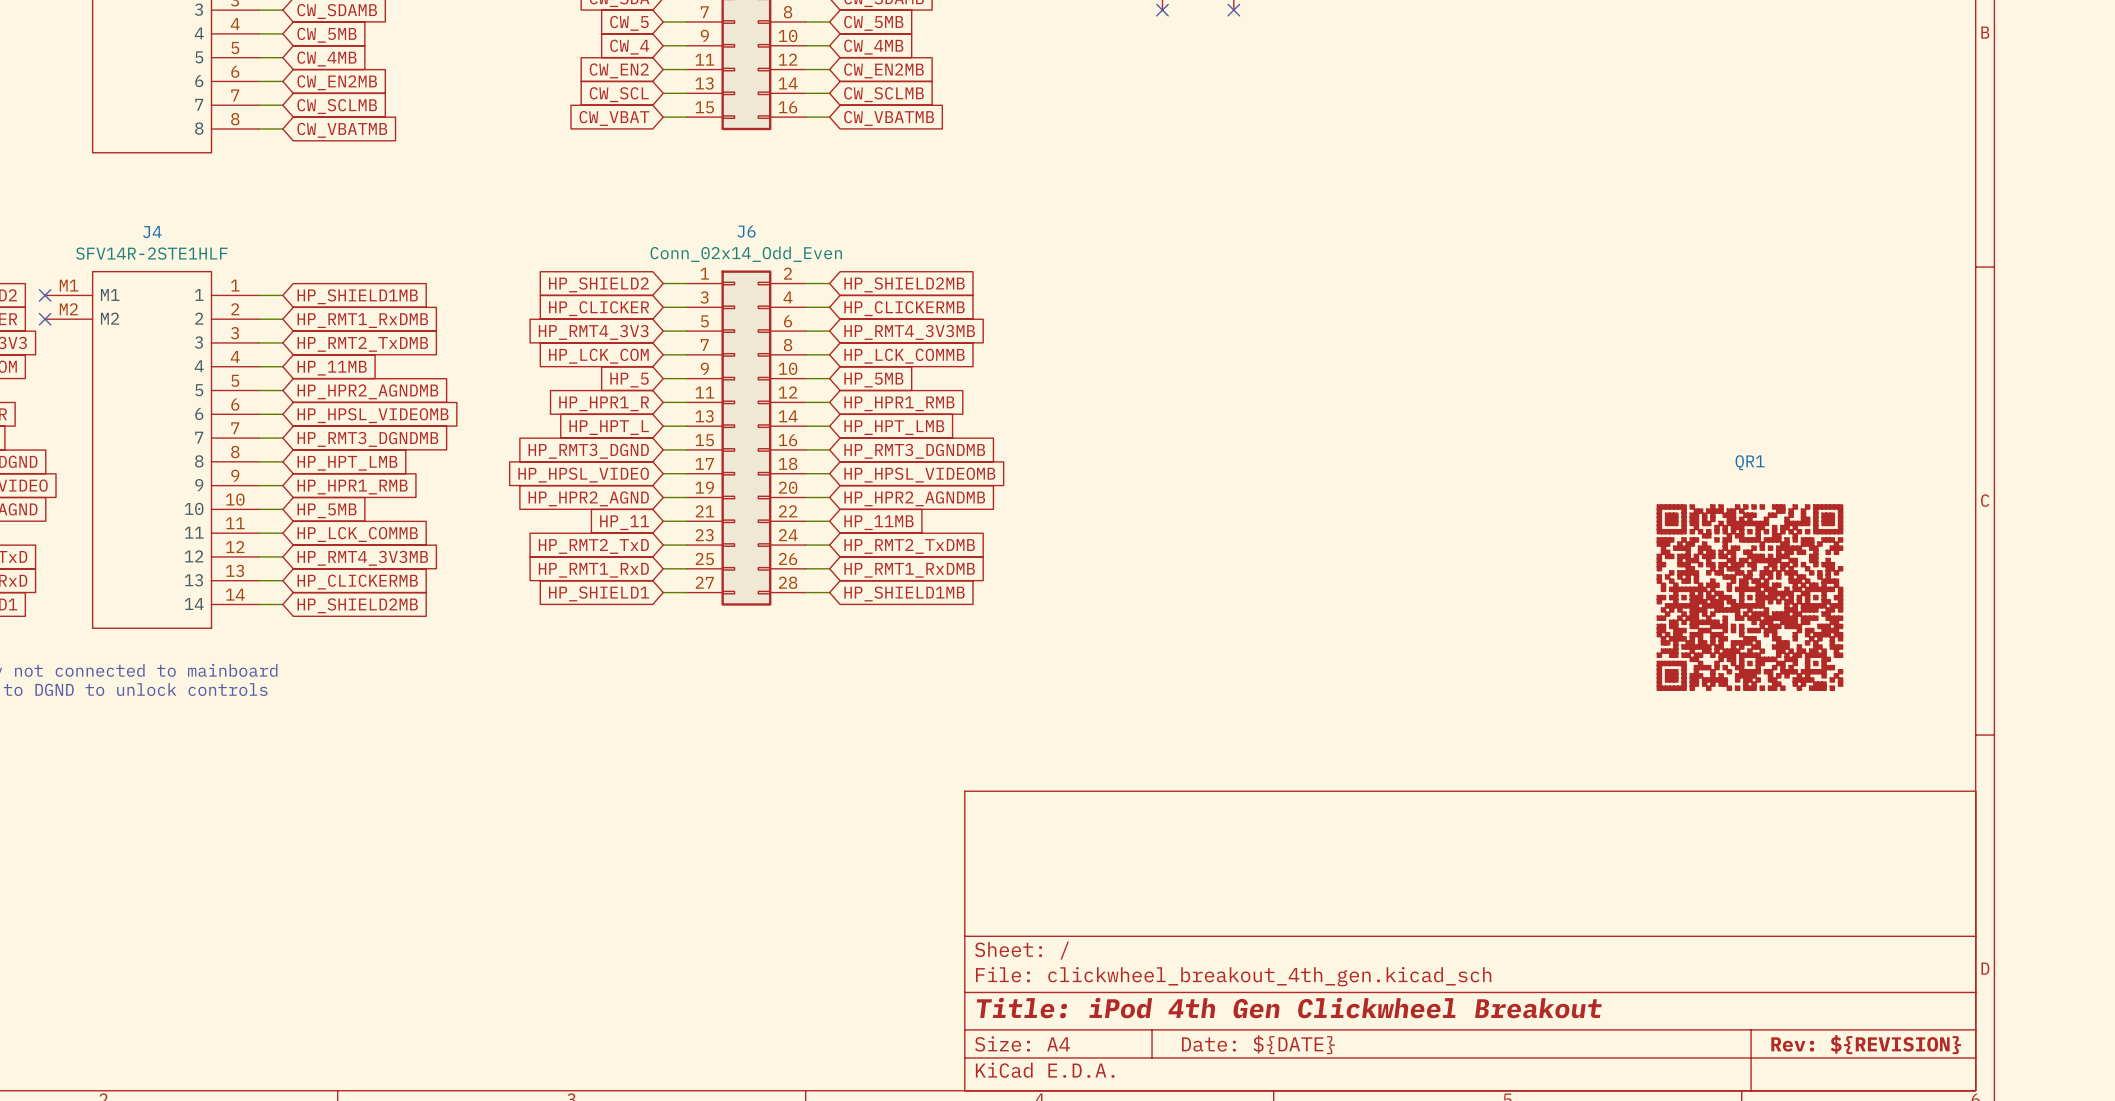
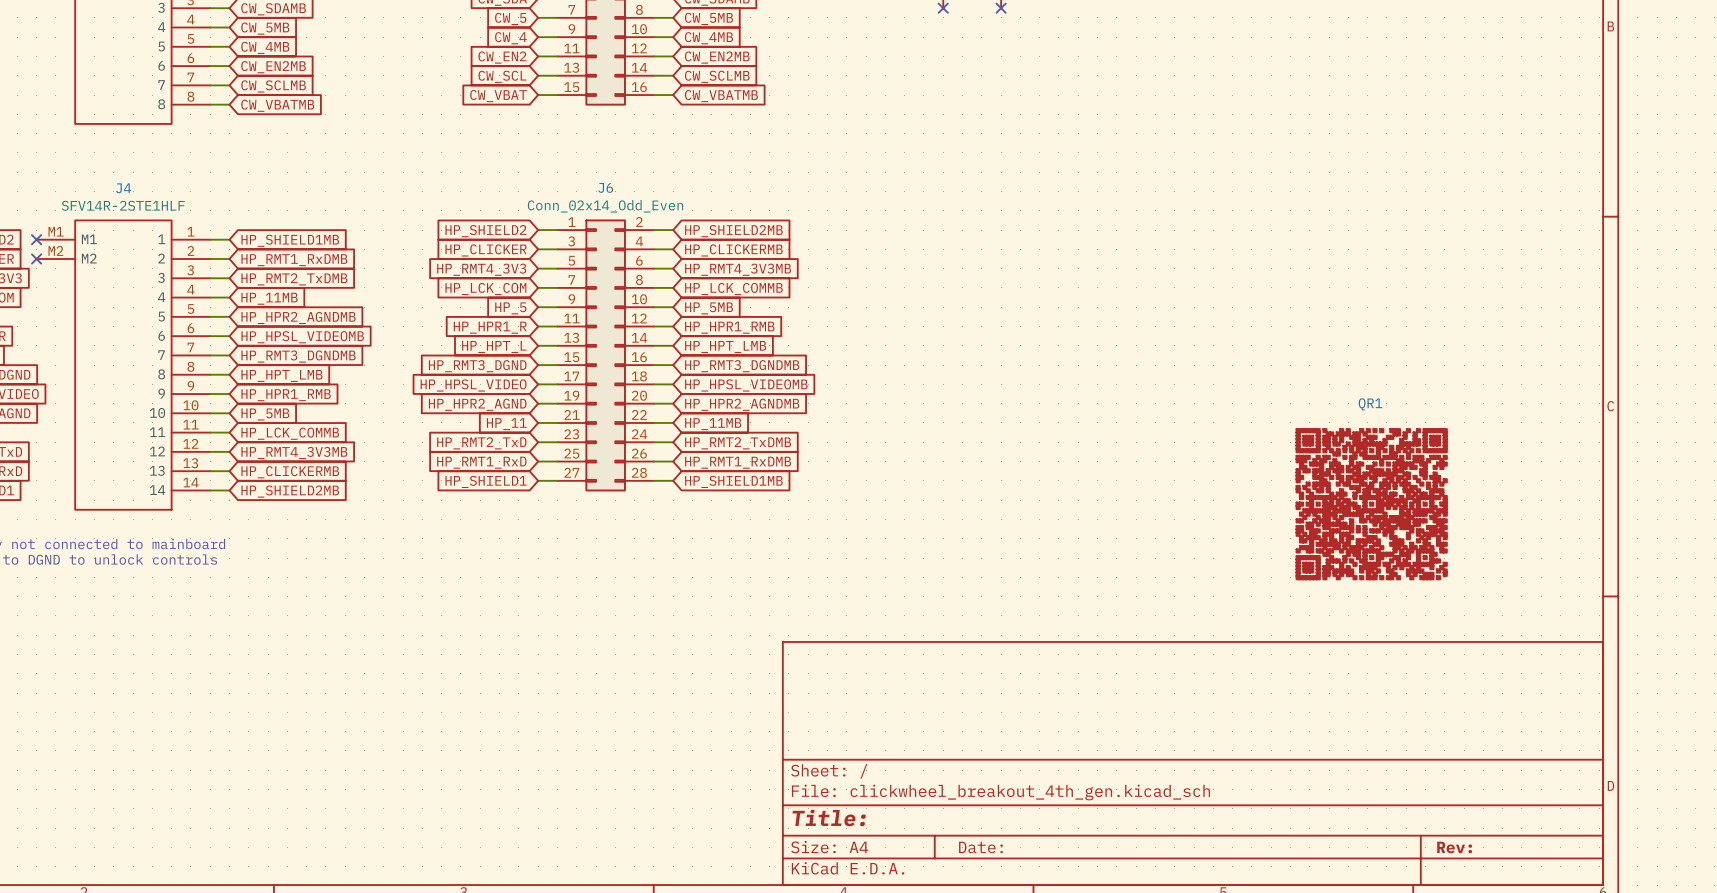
QR1 name position: QR1 (1750, 462) -> QR1 (1370, 404)
QR1 position: (1749, 597) -> (1371, 504)
title block: Title: iPod 4th Gen Clickwheel Breakout (1289, 1008) -> Title: (829, 817)
title block: Date: ${DATE} (1258, 1044) -> Date: (980, 847)
title block: Rev: ${REVISION} (1866, 1044) -> Rev: (1454, 847)

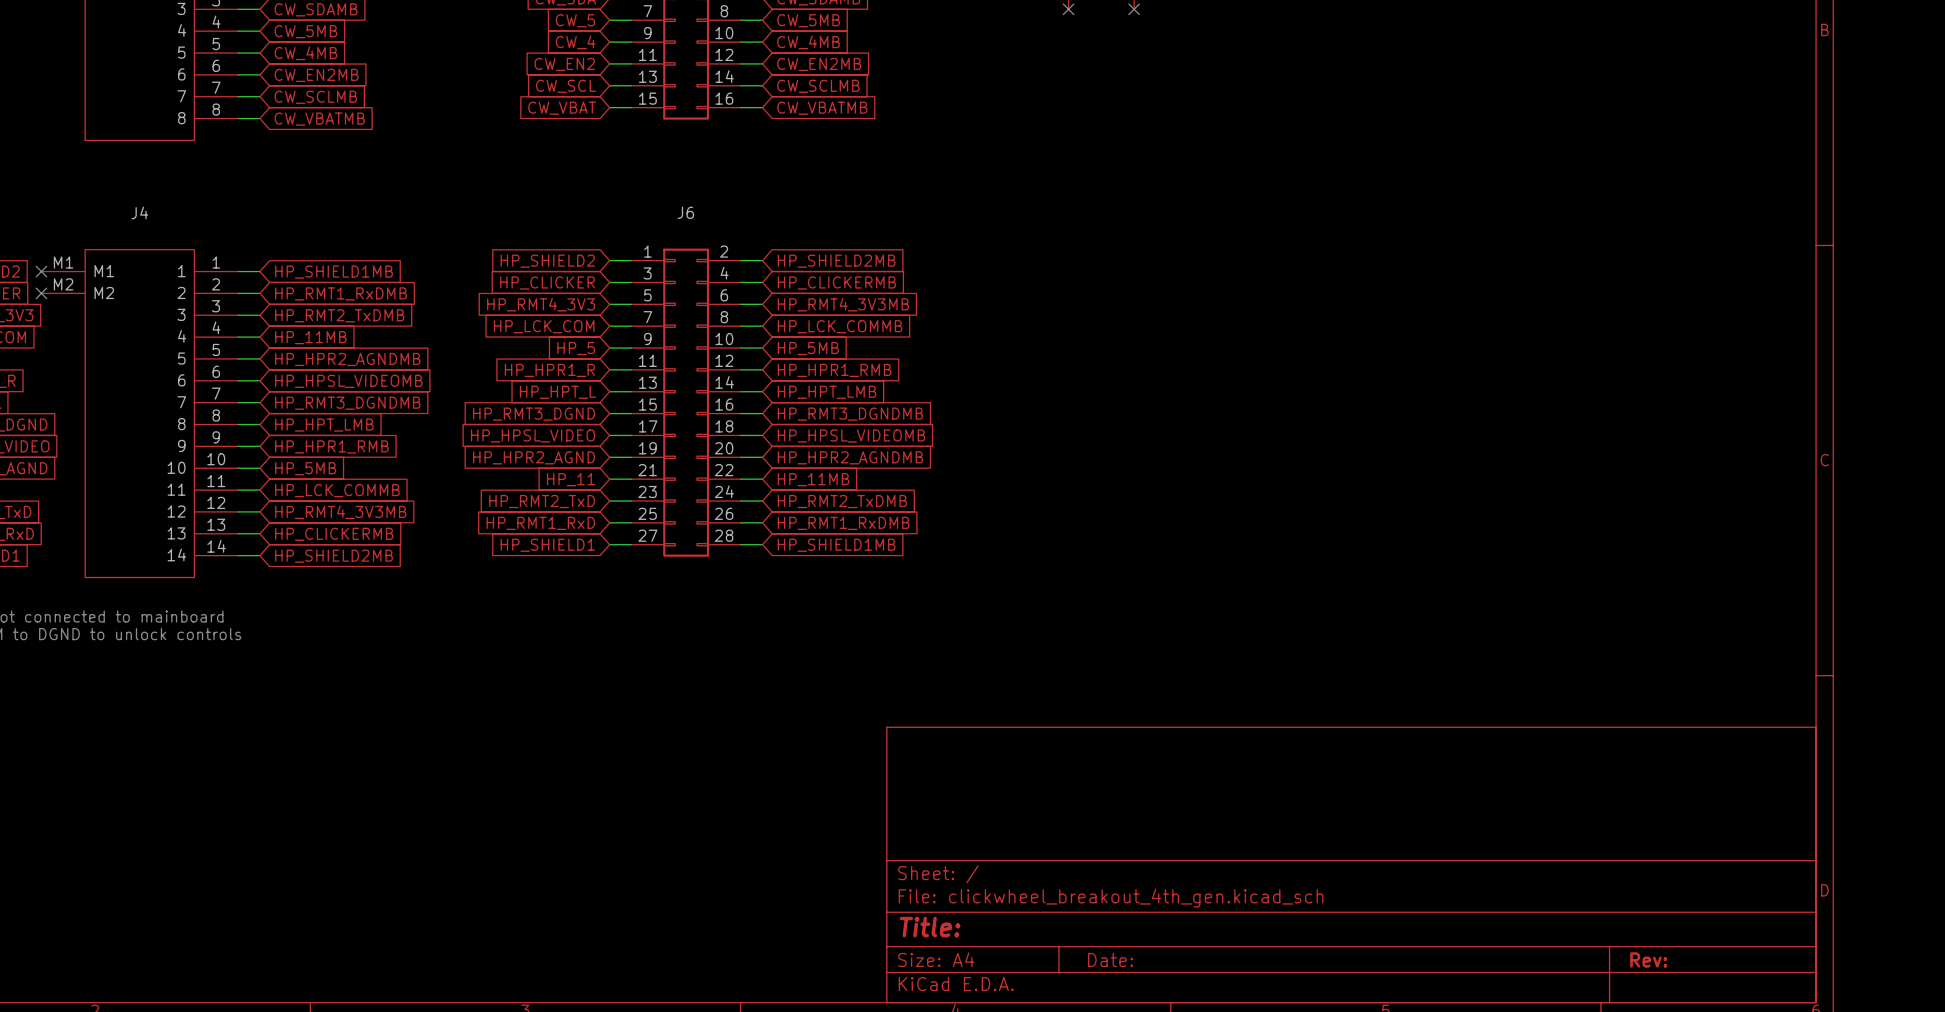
J4 value: SFV14R-2STE1HLF (123, 205) -> none
J6 value: Conn_02x14_Odd_Even (605, 206) -> none
QR1: (1371, 504) -> none

